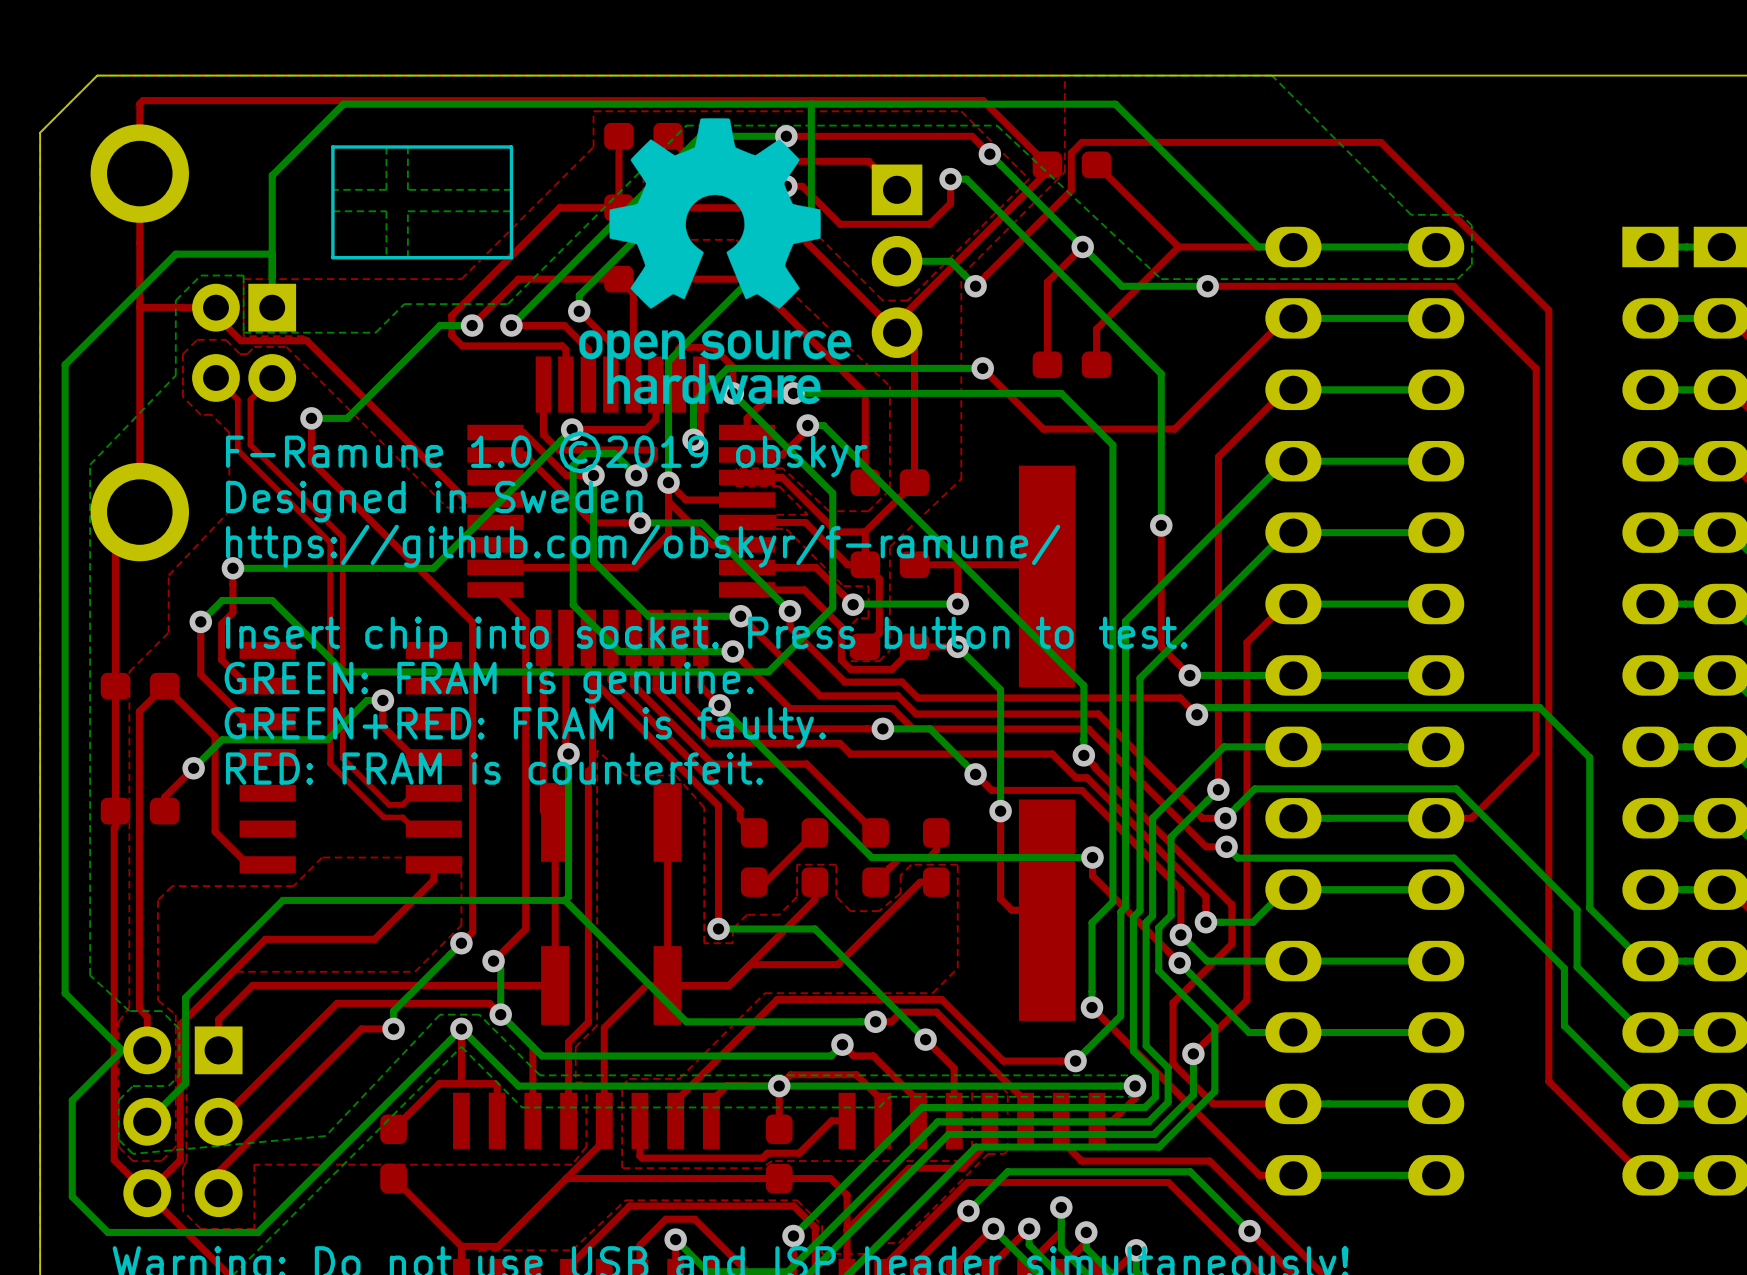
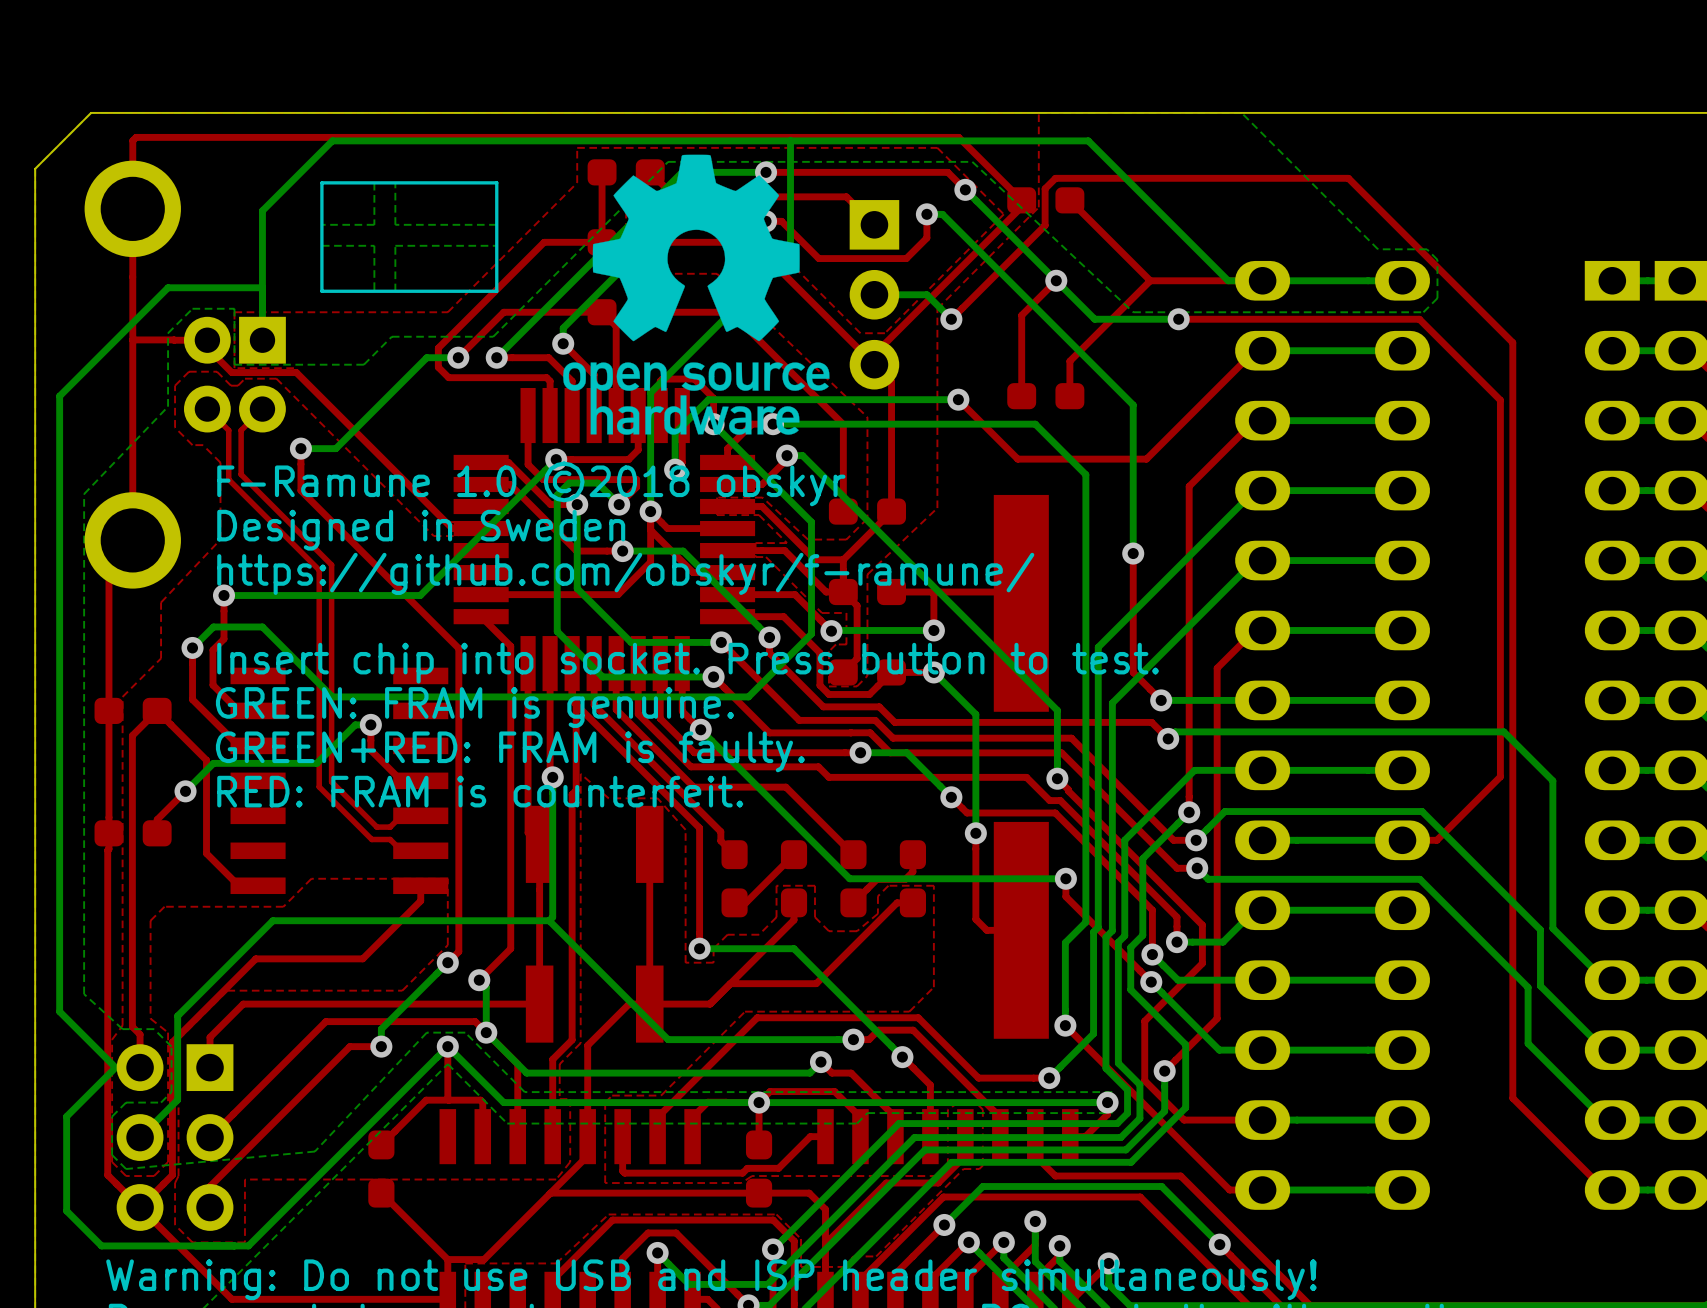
text: F-Ramune 1.0 ©2019 obskyr (546, 454) -> F-Ramune 1.0 ©2018 obskyr (531, 483)

